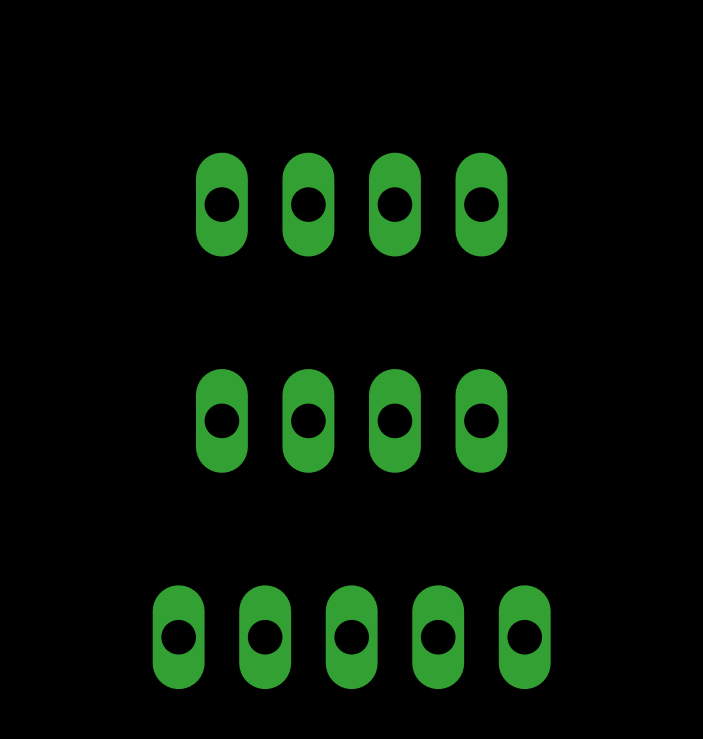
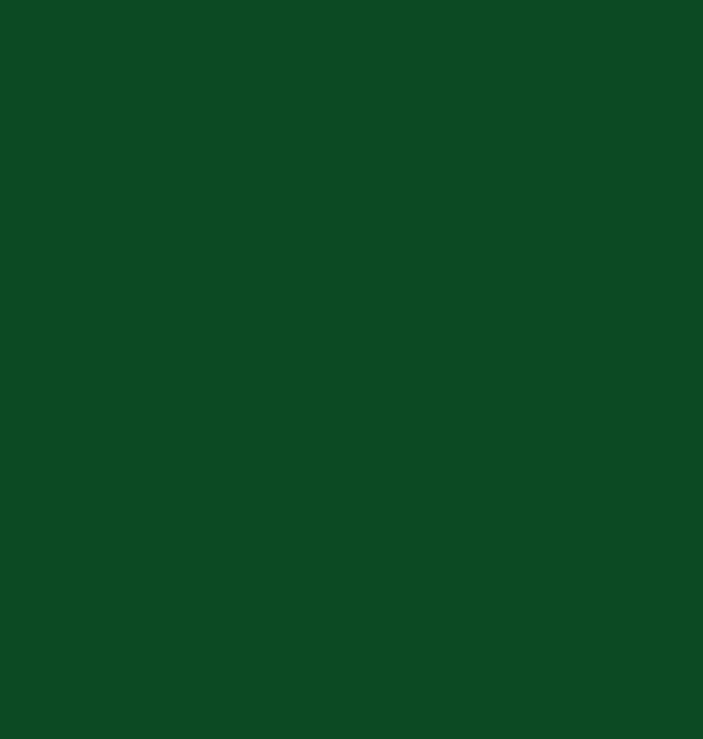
part: (351, 204) -> none
part: (351, 420) -> none
part: (351, 637) -> none

